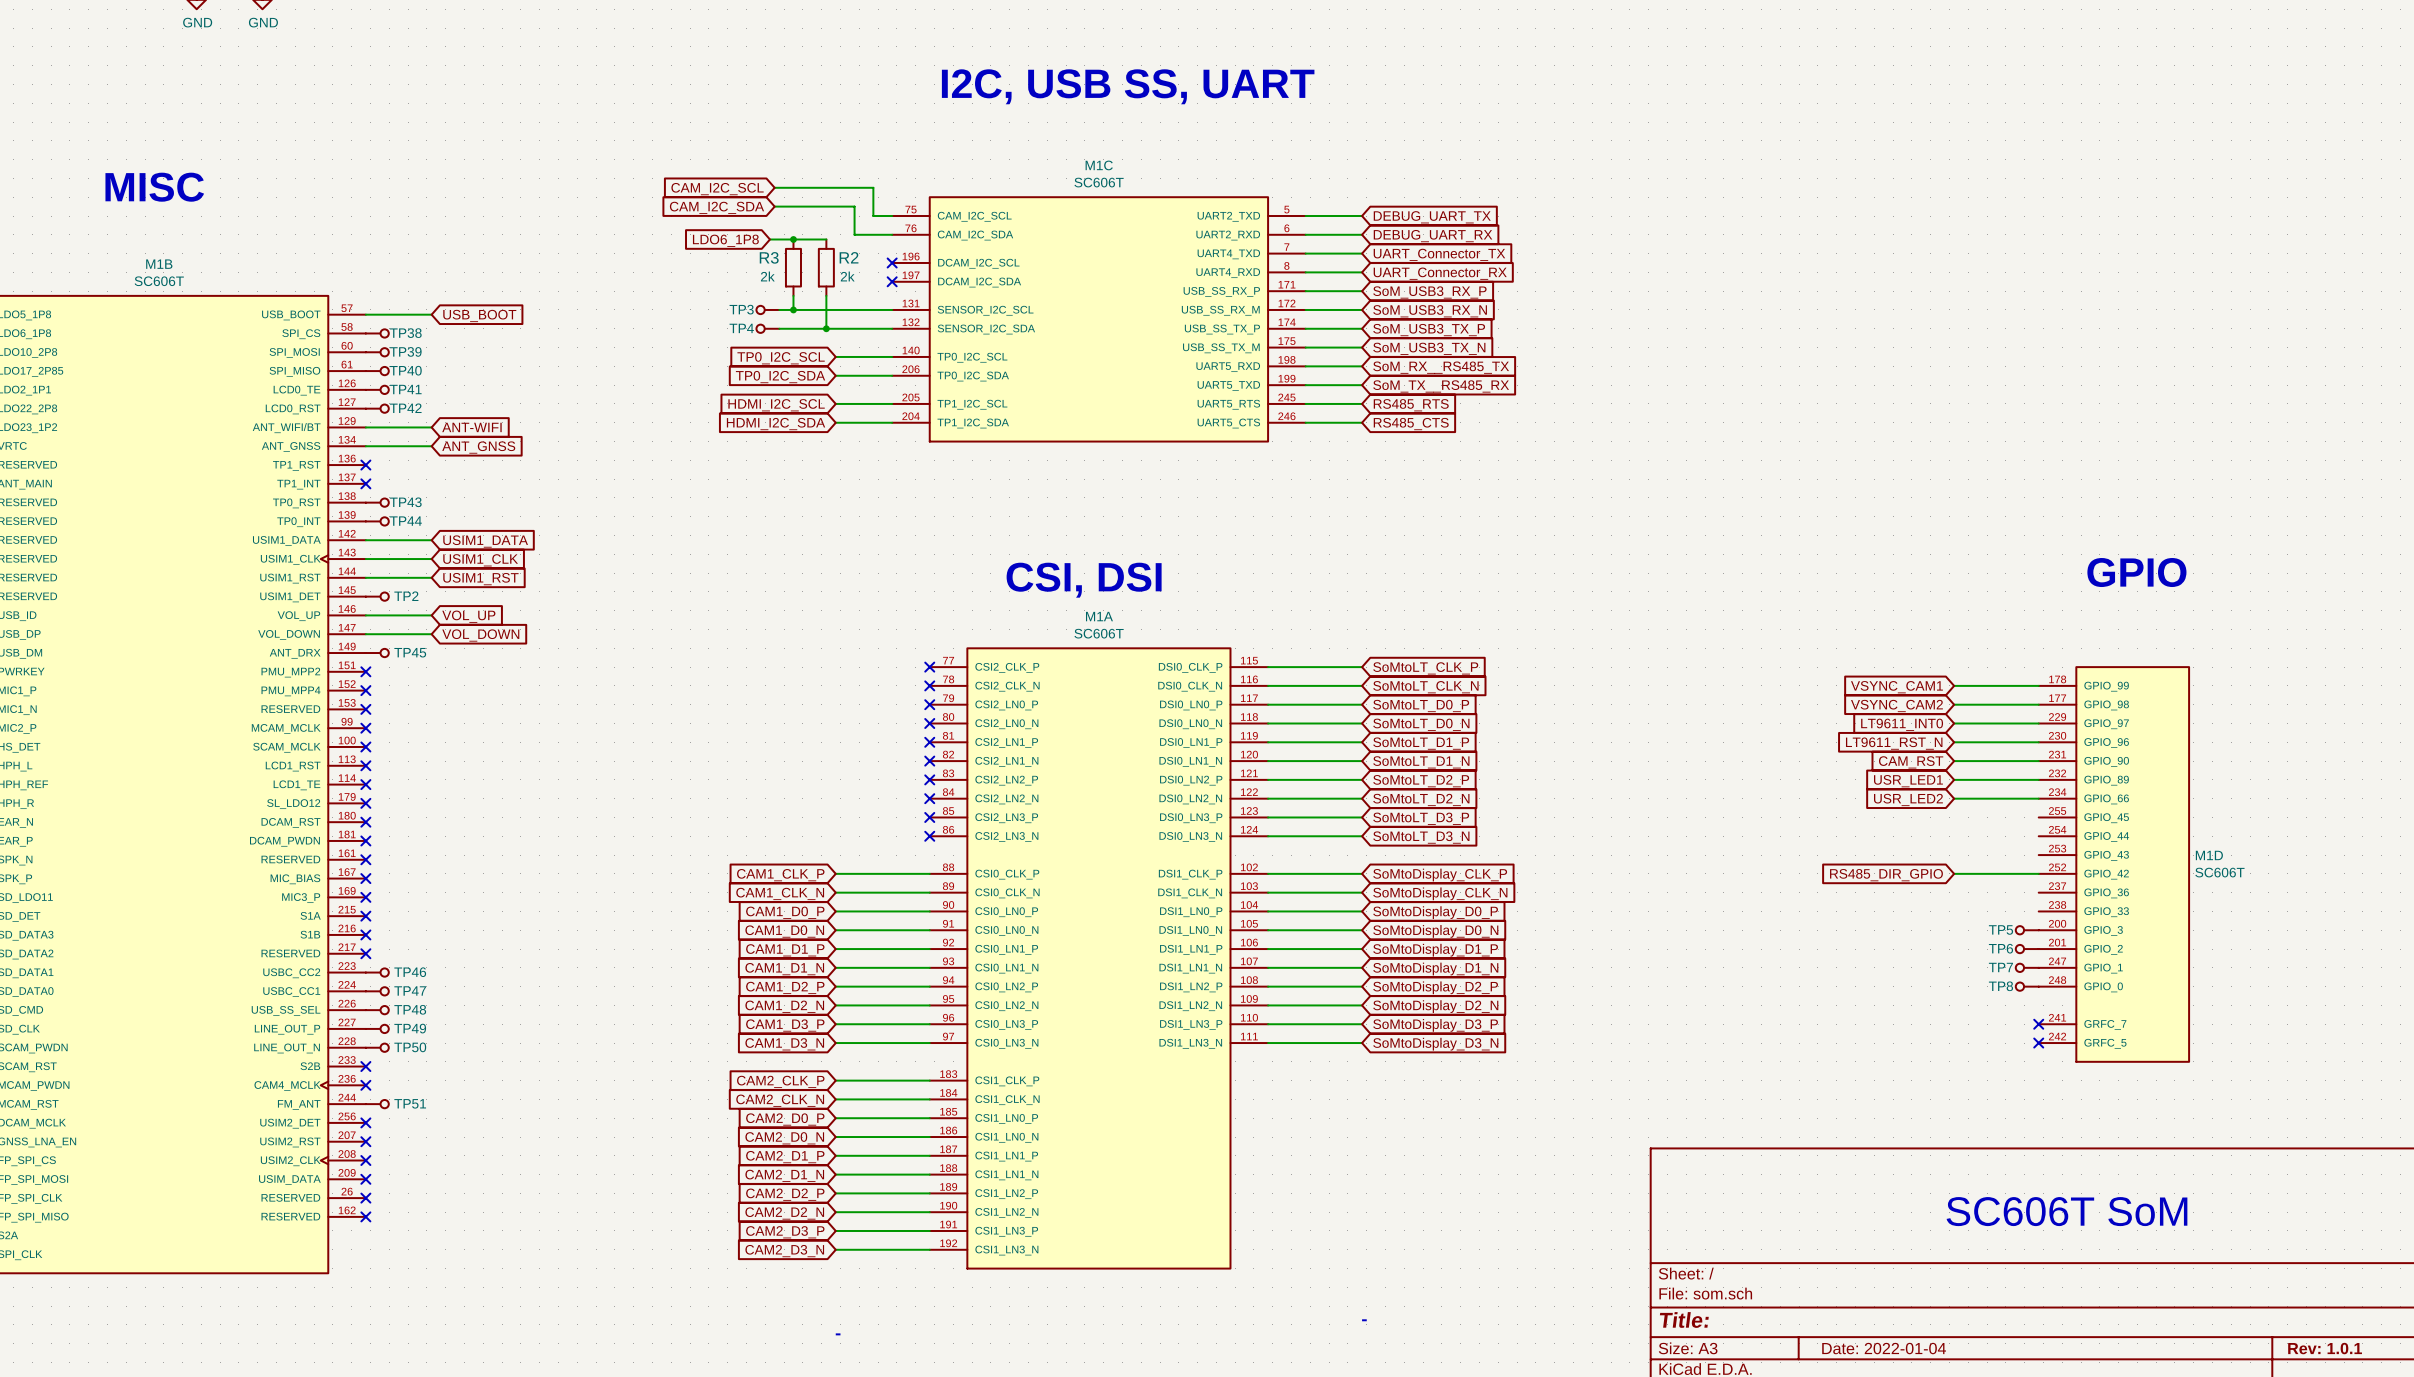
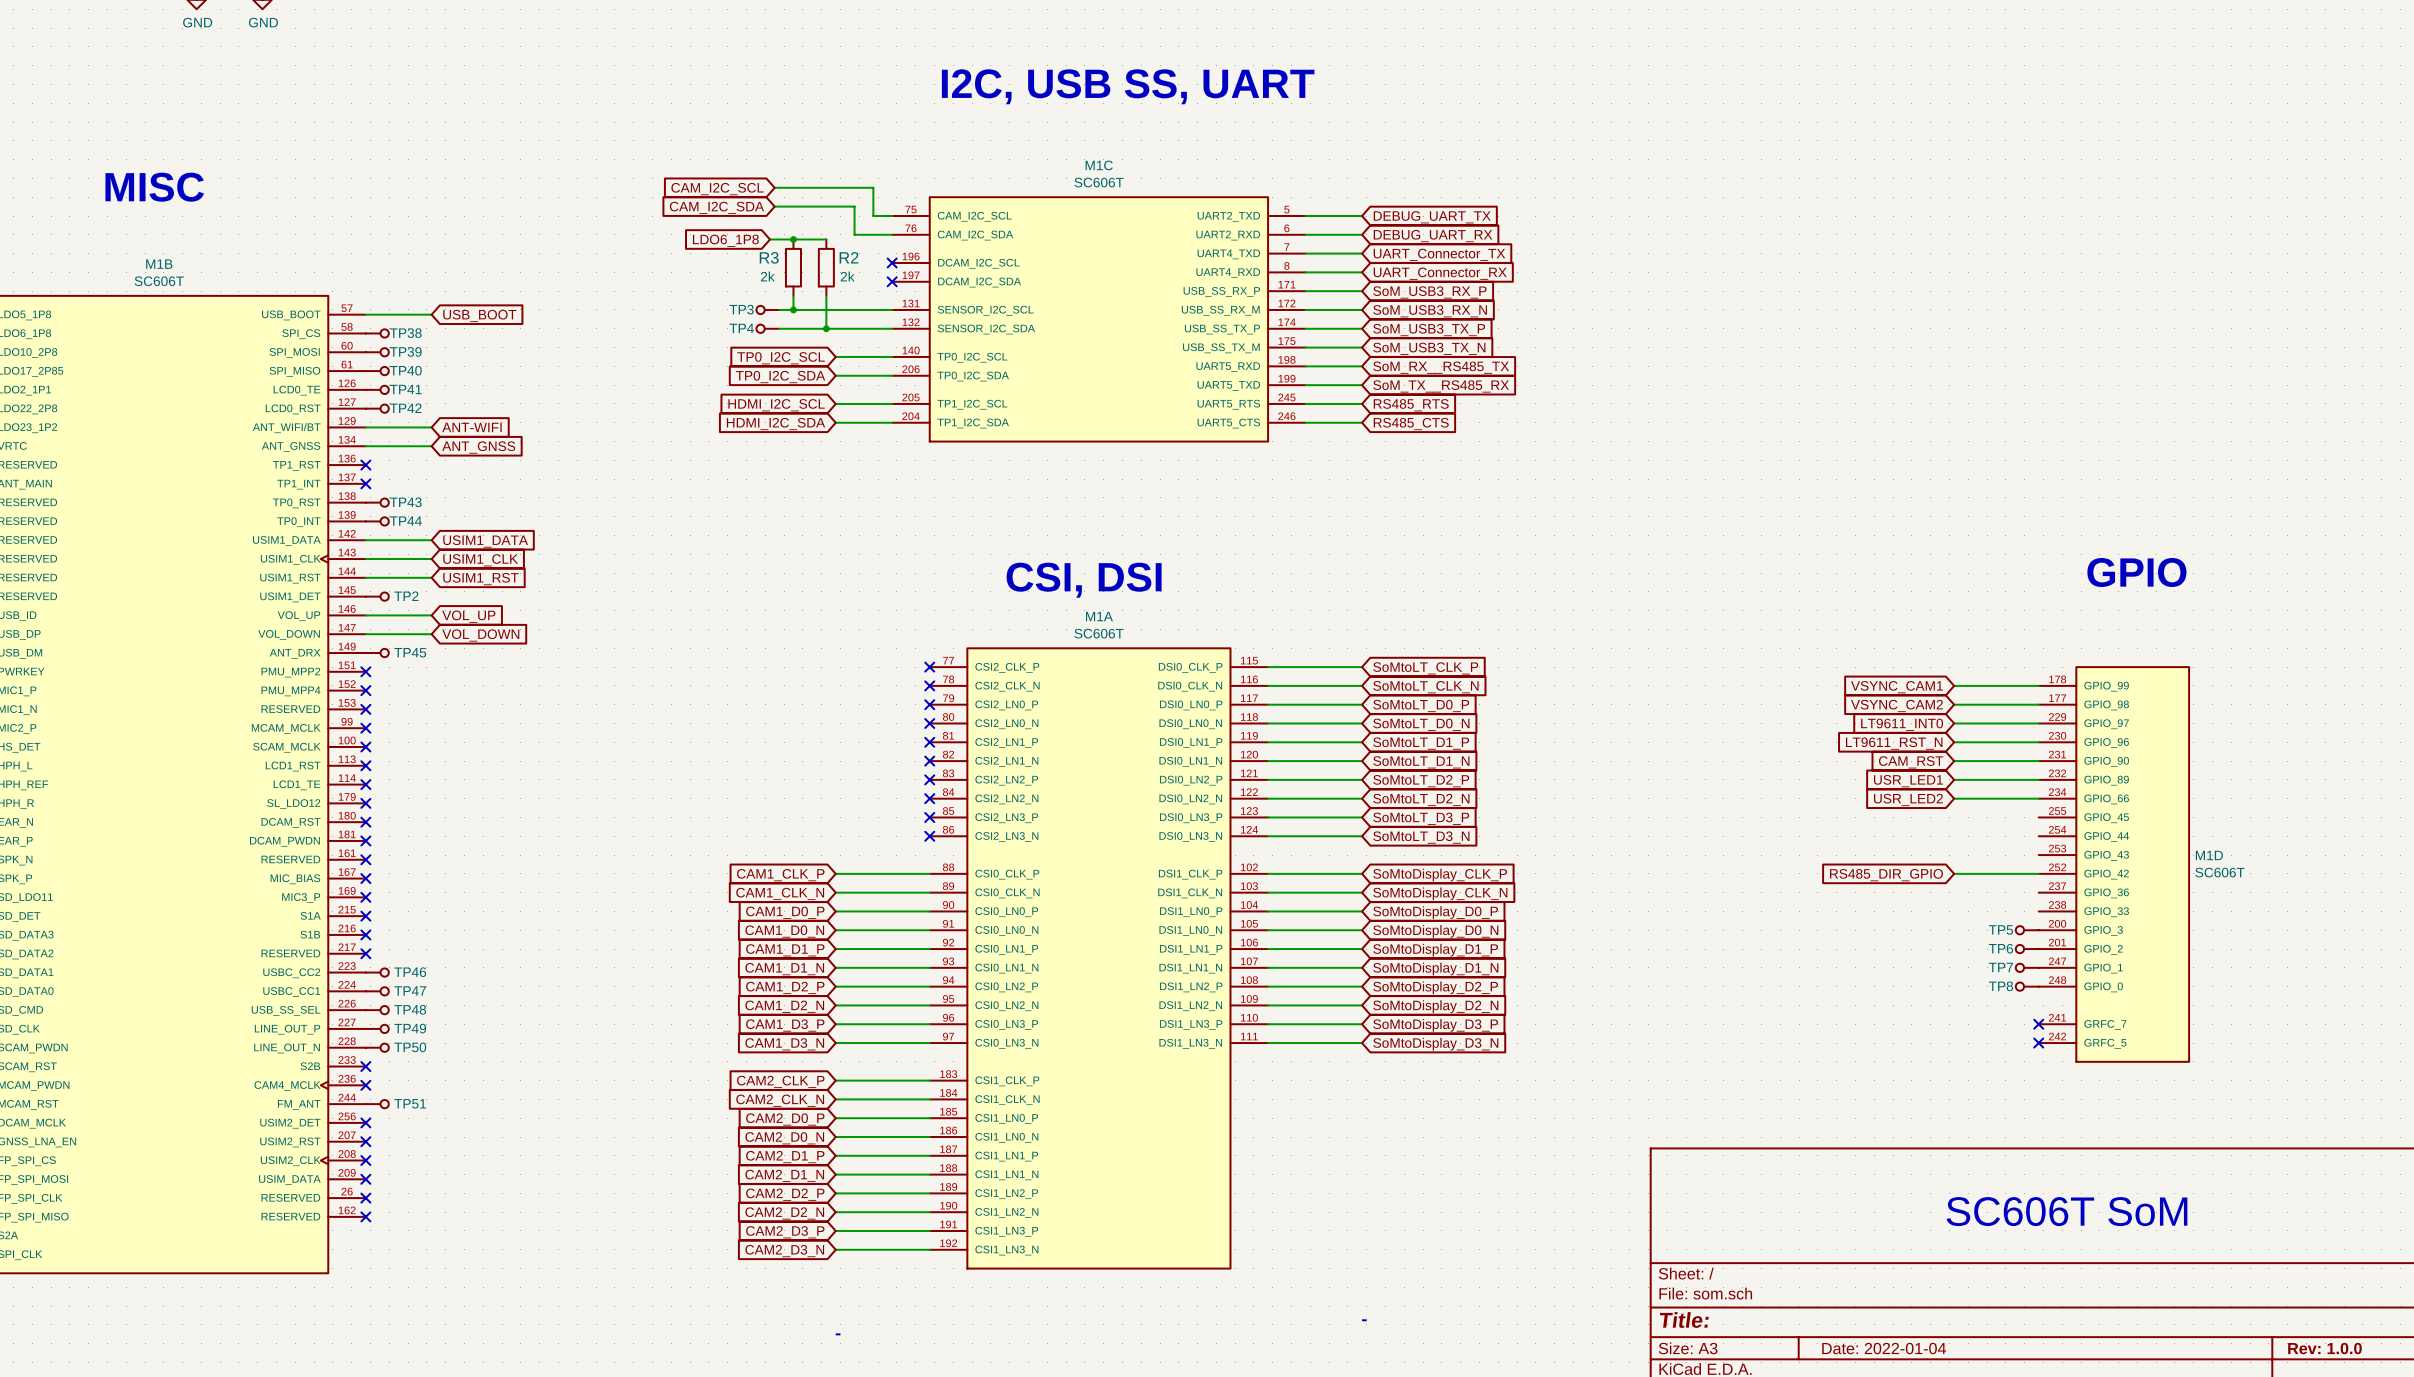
title block: Rev: 1.0.1 (2325, 1348) -> Rev: 1.0.0 (2324, 1348)

